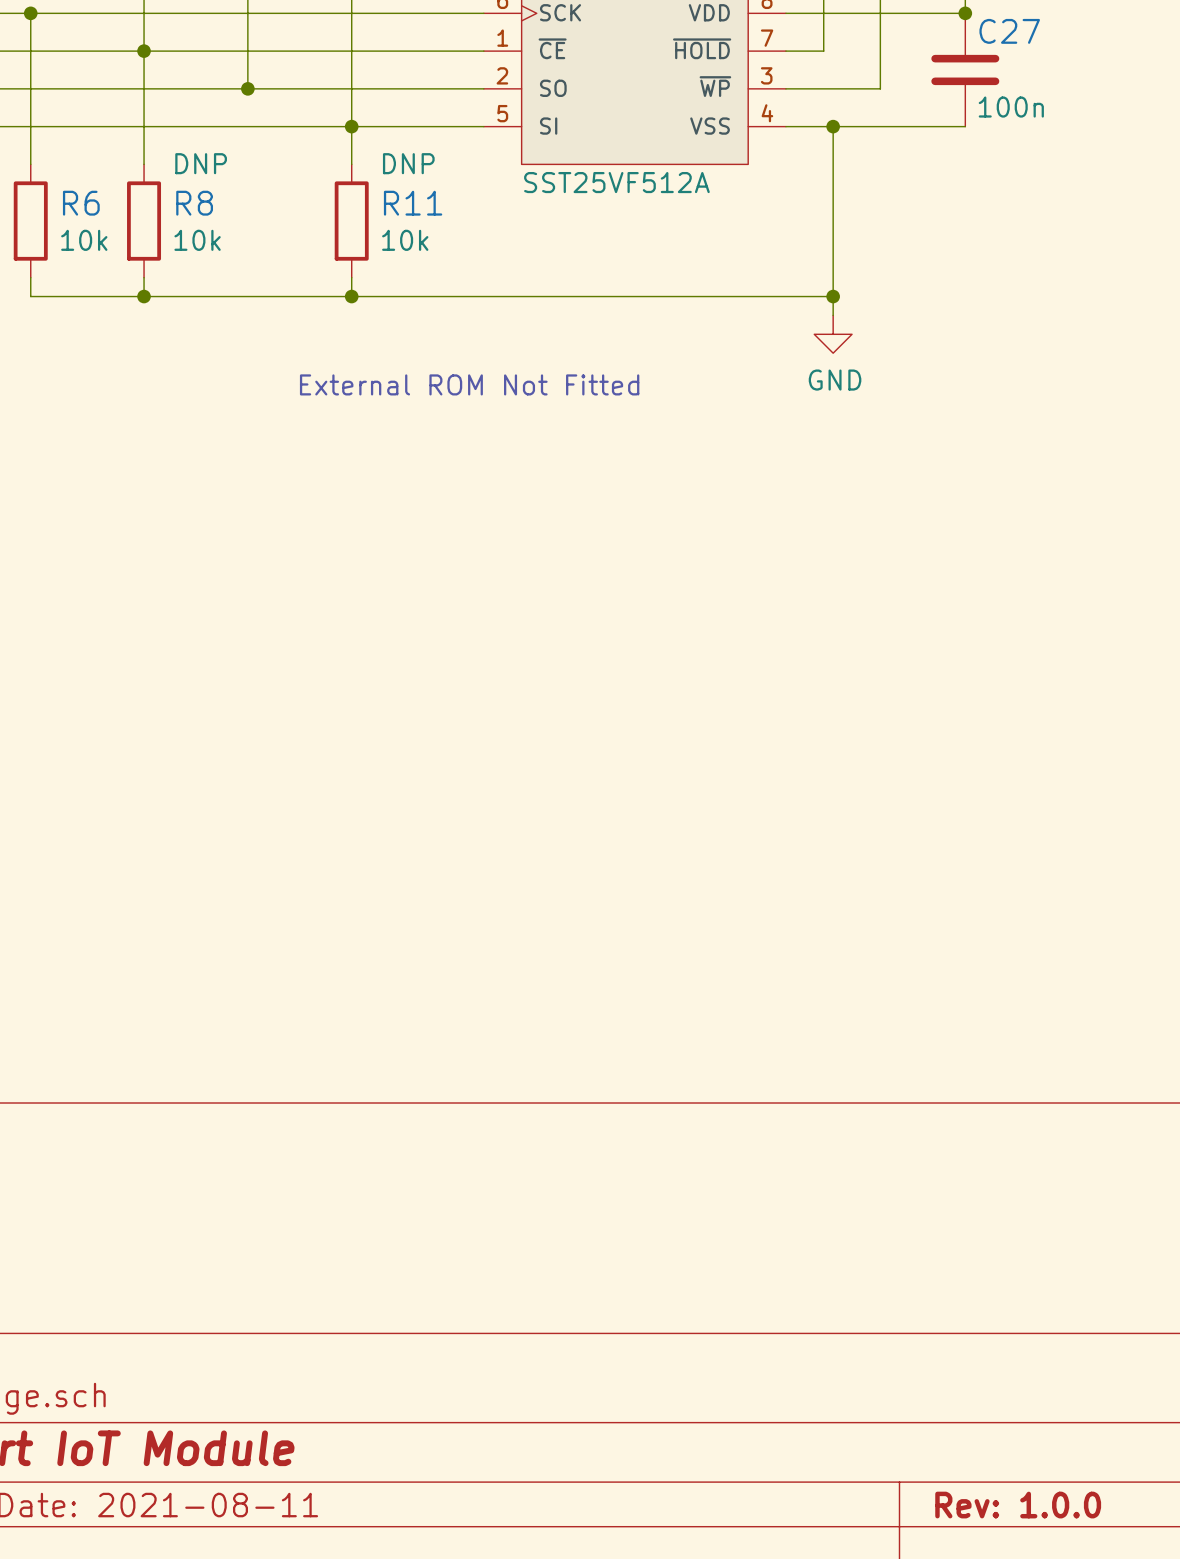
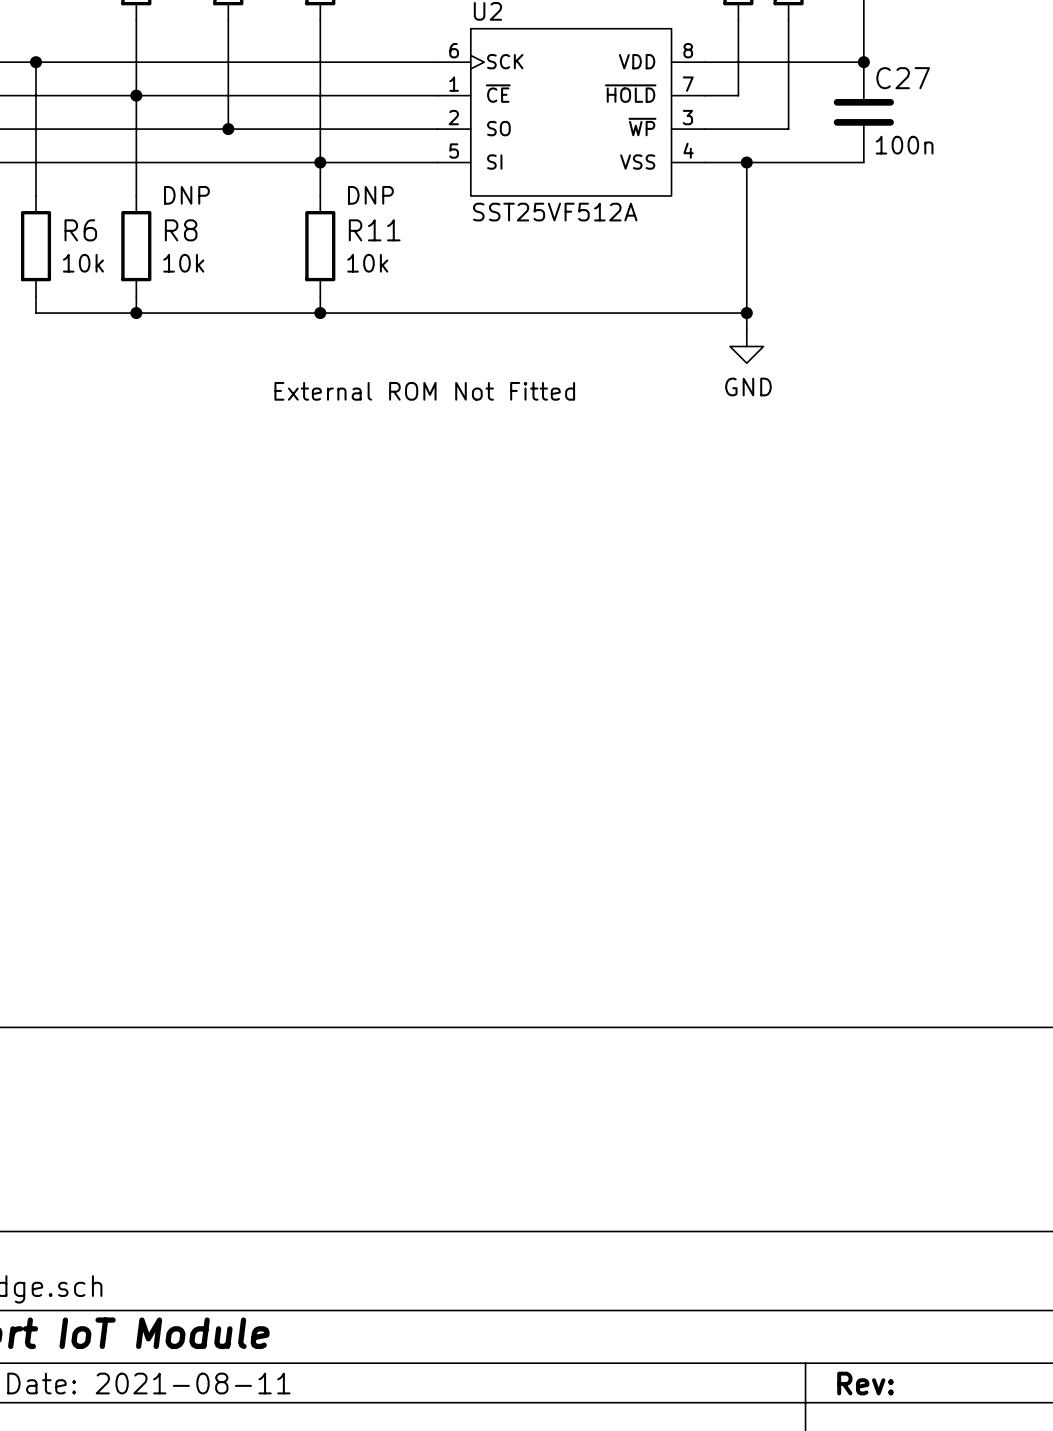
title block: Rev: 1.0.0 (1018, 1505) -> Rev: (865, 1383)

